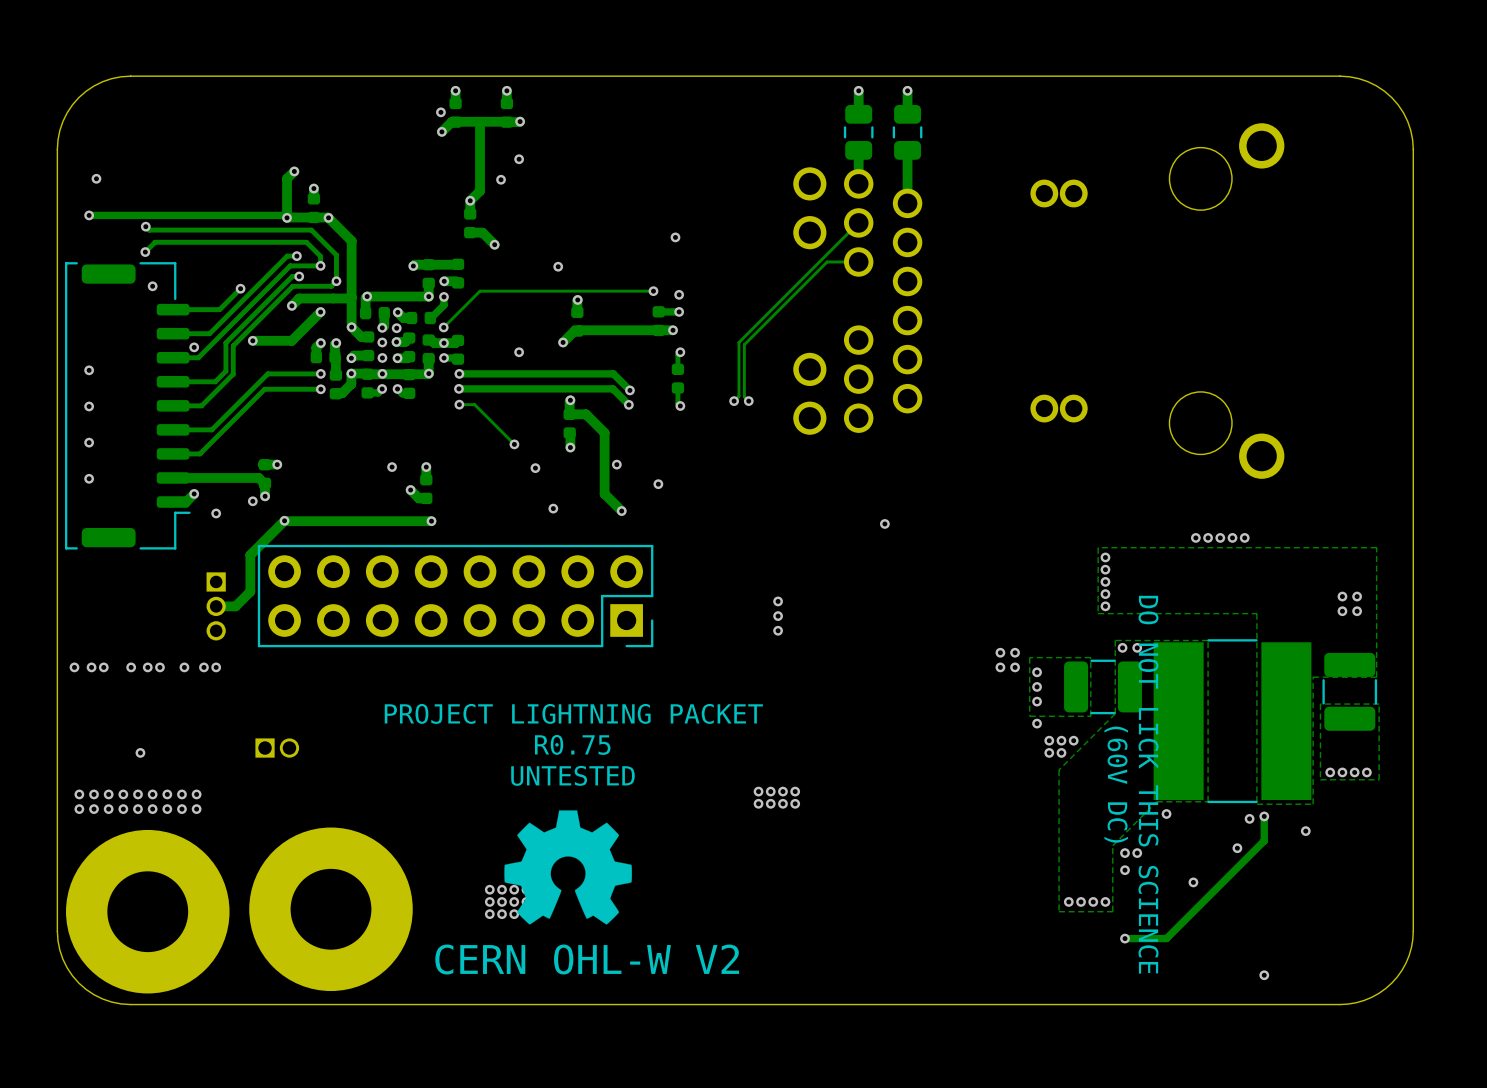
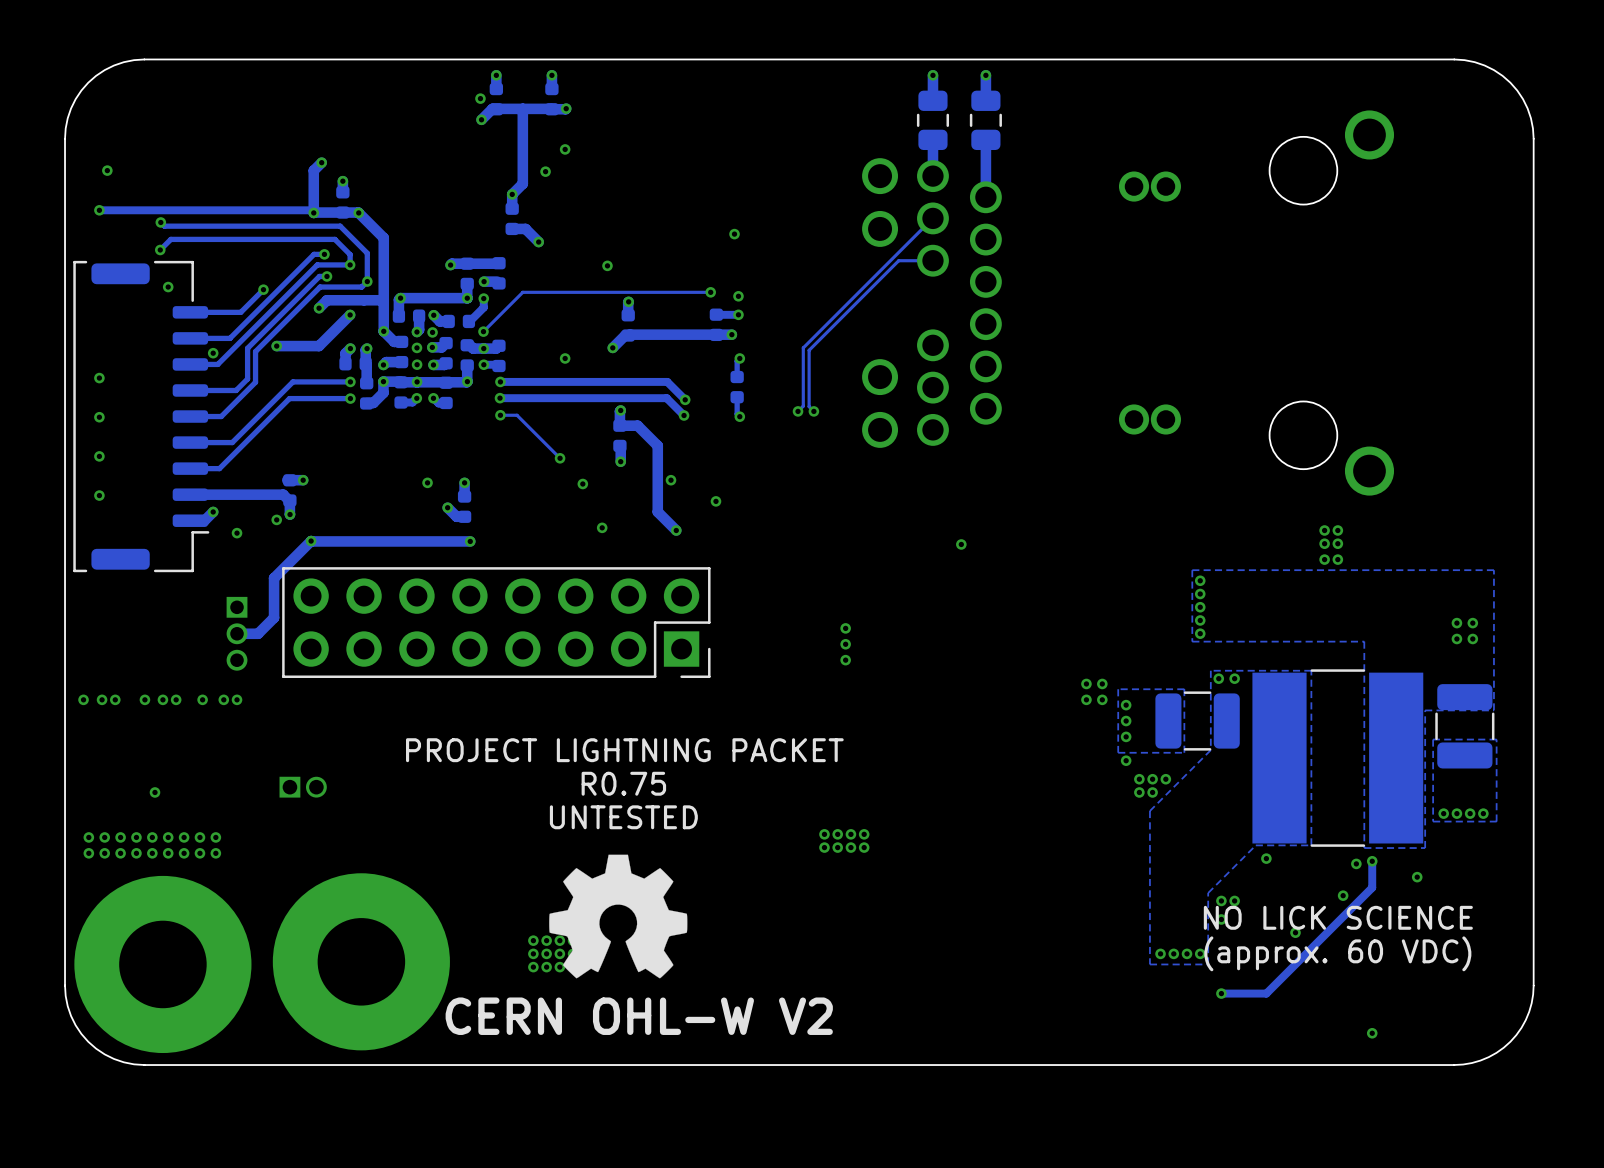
via: none -> (1324, 530)
via: none -> (1337, 530)
via: none -> (1324, 543)
via: none -> (1337, 543)
via: (1195, 537) -> none
via: (1208, 537) -> none
via: (1244, 537) -> none
text: (60V DC) (1116, 784) -> none
text: DO NOT LICK THIS SCIENCE (1148, 784) -> NO LICK SCIENCE (1338, 917)
text: none -> (approx. 60 VDC) (1337, 953)

